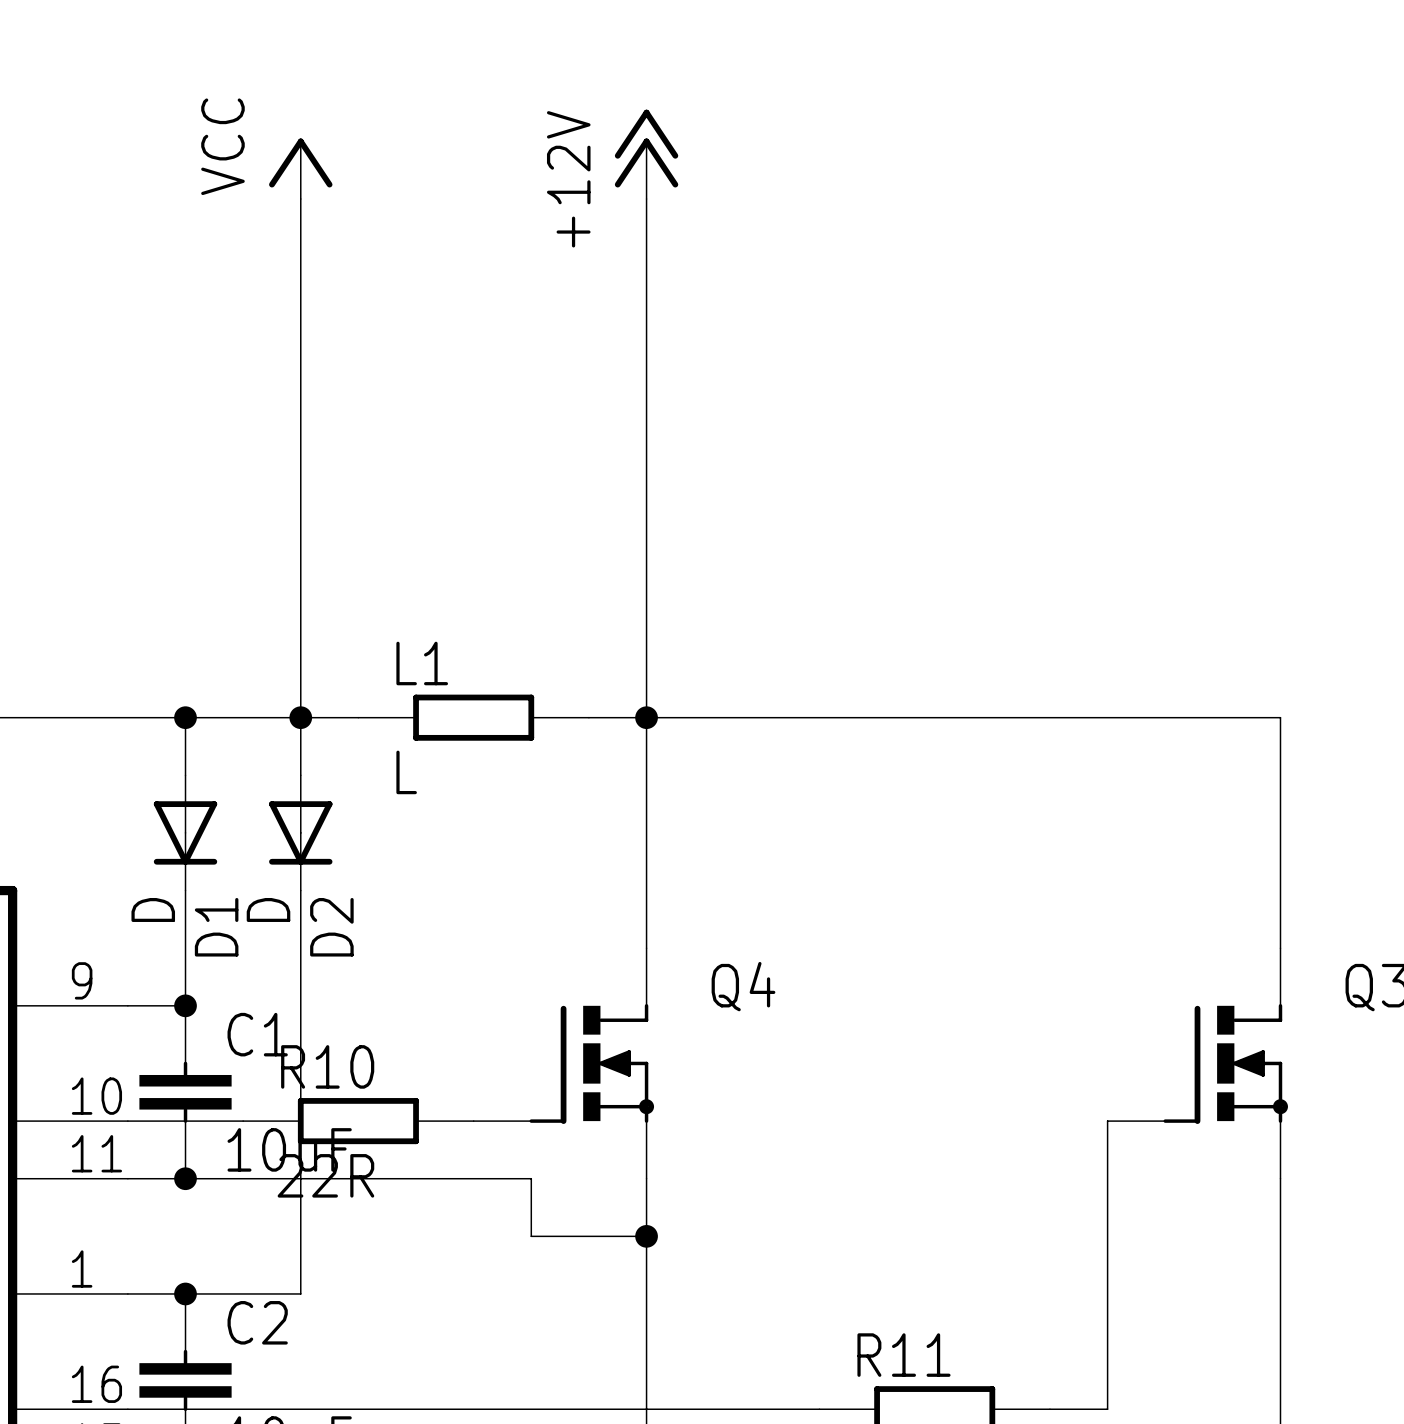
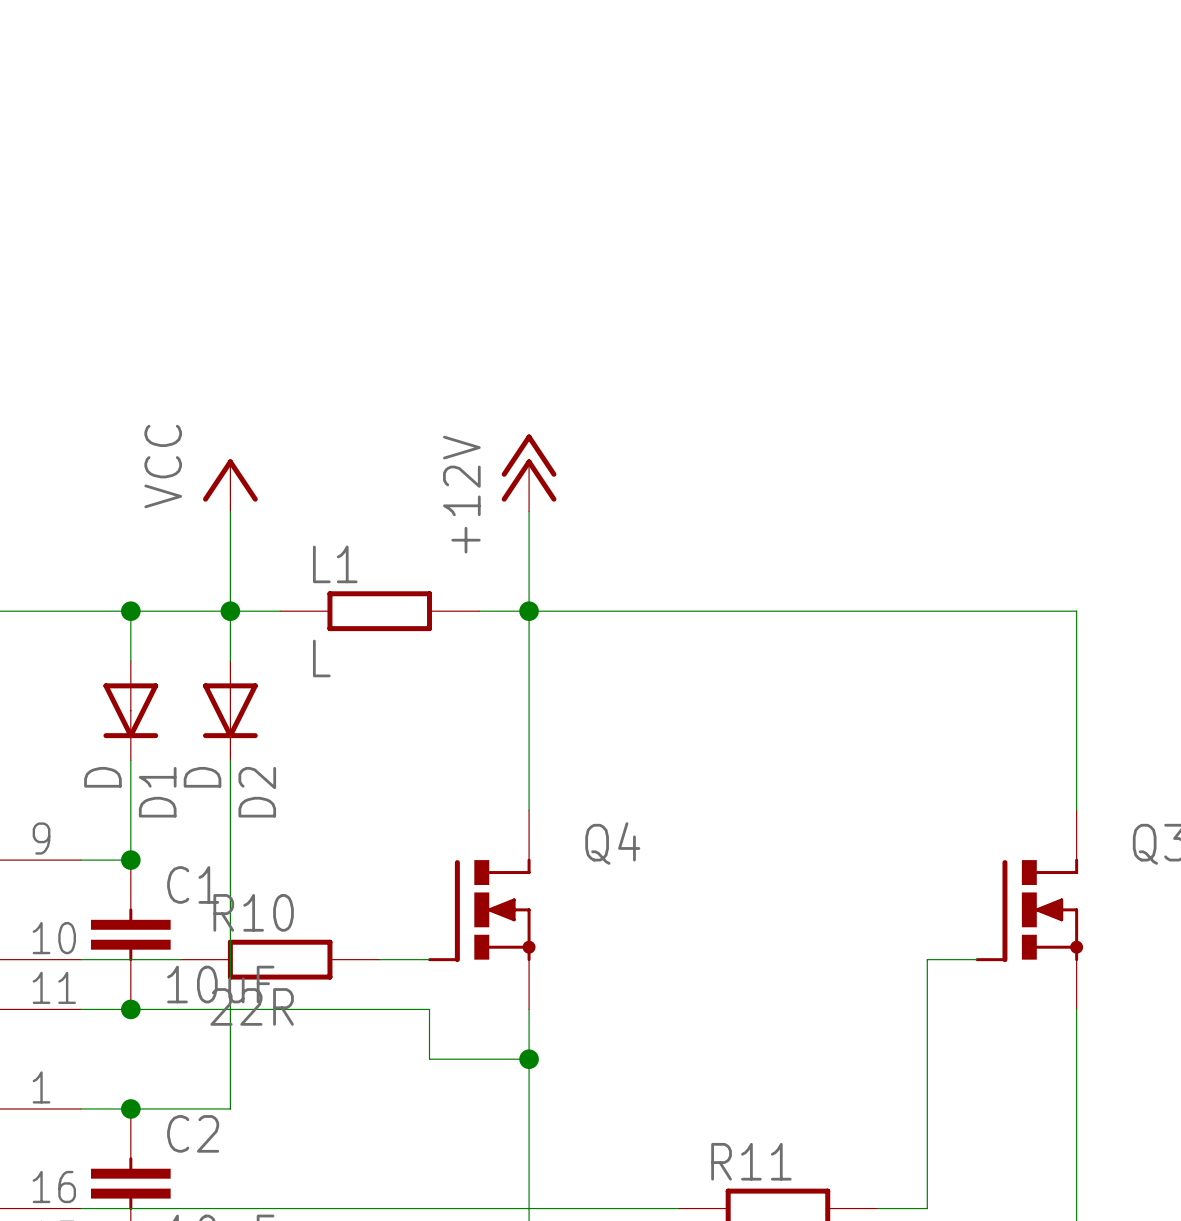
power symbol position: +12V (646, 154) -> +12V (529, 473)
power symbol position: VCC (300, 168) -> VCC (230, 485)
wire: (300, 199) (300, 602) -> none
wire: (646, 199) (646, 602) -> none

